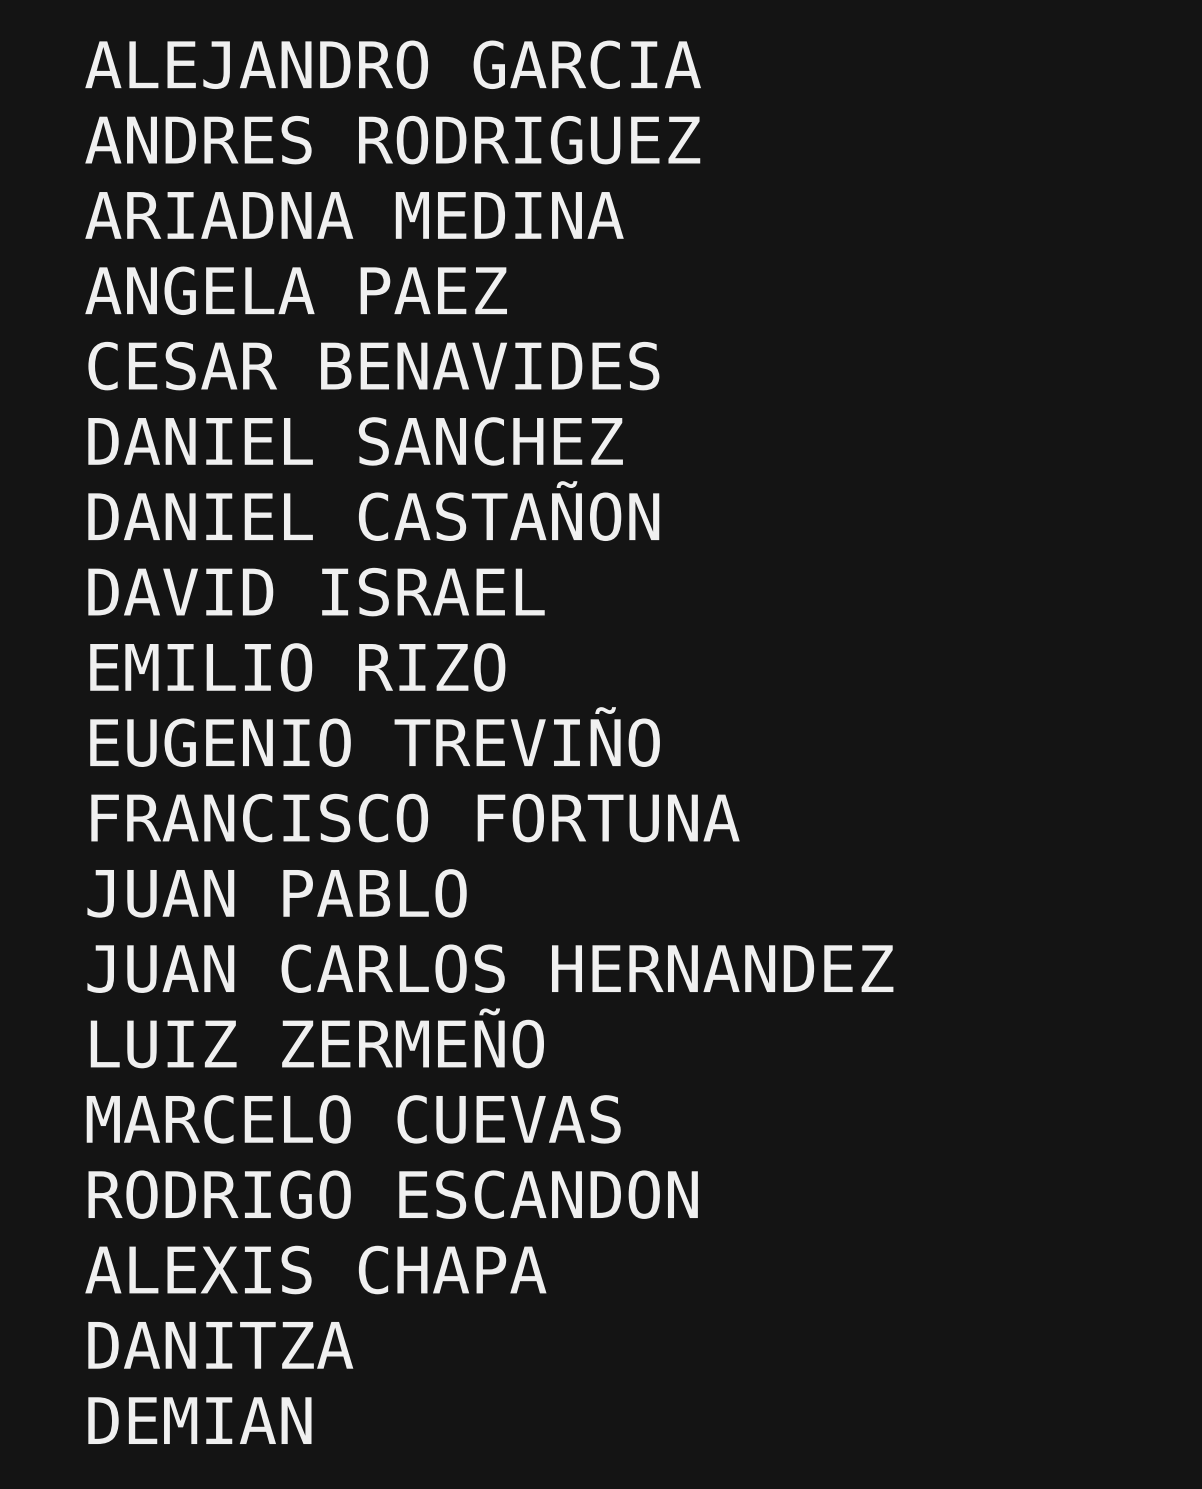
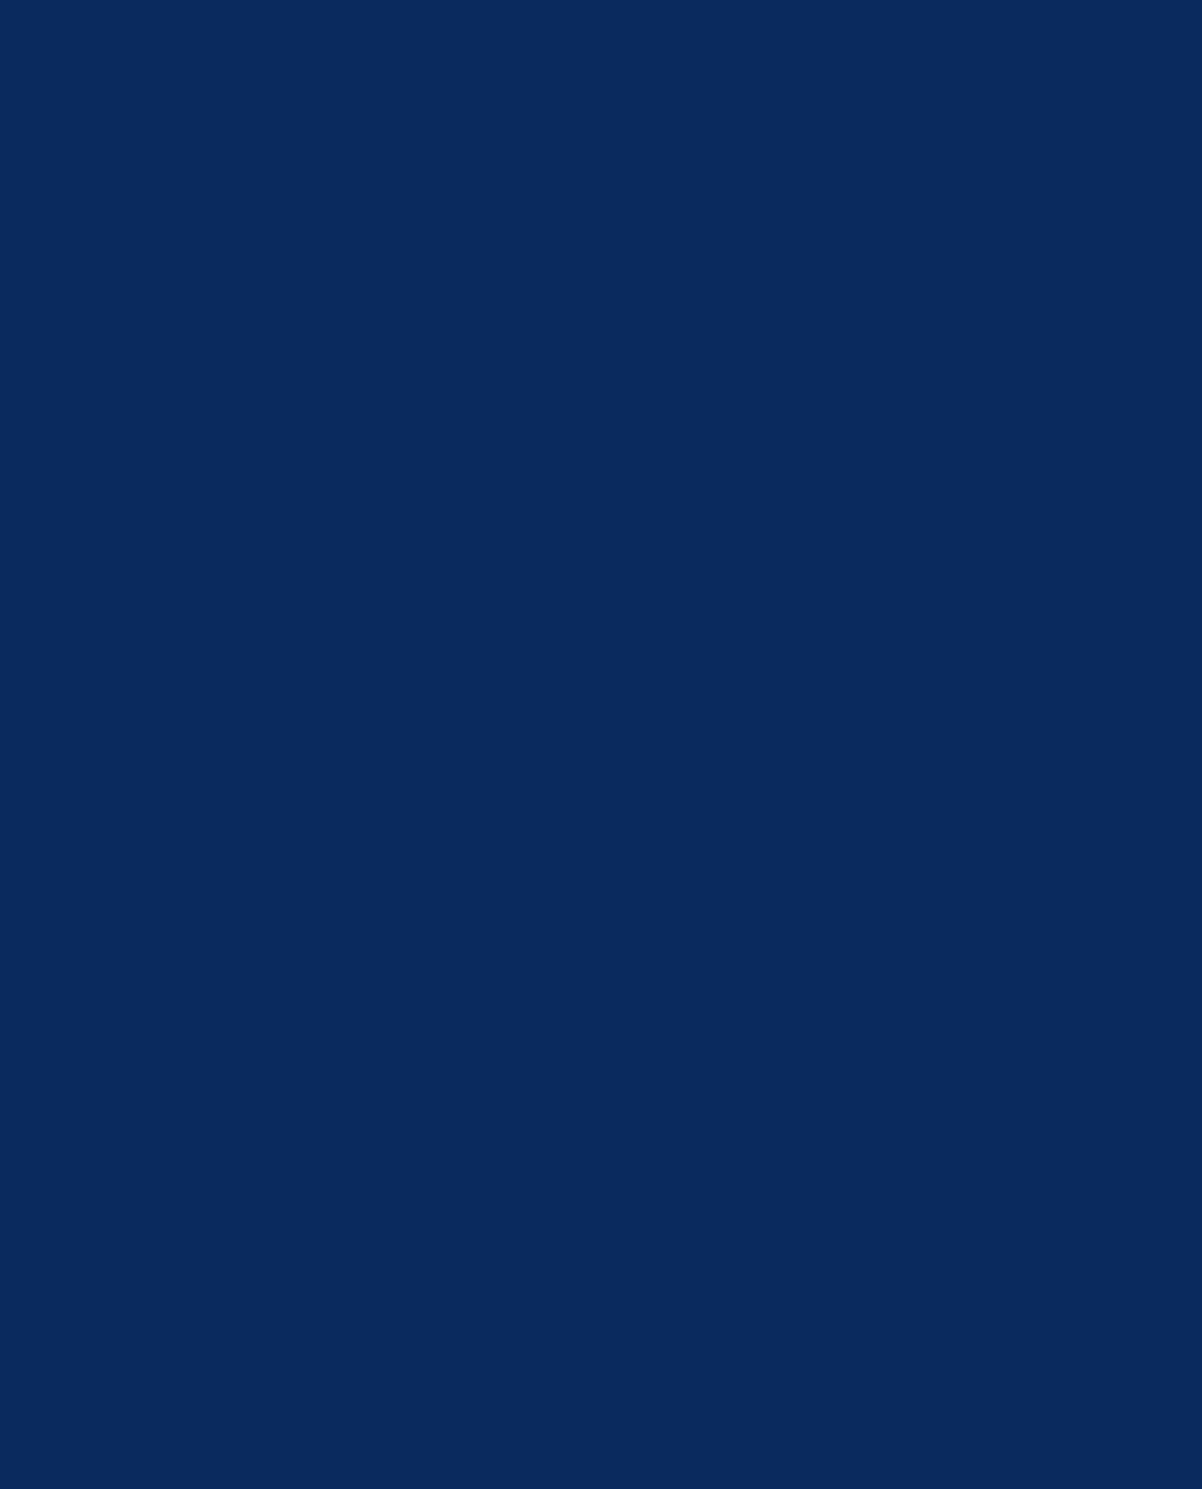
text: ALEJANDRO GARCIA (393, 64) -> none
text: ANDRES RODRIGUEZ (392, 140) -> none
text: ARIADNA MEDINA (354, 215) -> none
text: ANGELA PAEZ (296, 290) -> none
text: CESAR BENAVIDES (373, 366) -> none
text: DANIEL SANCHEZ (355, 441) -> none
text: DANIEL CASTAÑON (373, 511) -> none
text: DAVID ISRAEL (316, 592) -> none
text: EMILIO RIZO (297, 667) -> none
text: EUGENIO TREVIÑO (375, 737) -> none
text: FRANCISCO FORTUNA (415, 818) -> none
text: JUAN PABLO (277, 893) -> none
text: JUAN CARLOS HERNANDEZ (490, 968) -> none
text: LUIZ ZERMEÑO (317, 1038) -> none
text: MARCELO CUEVAS (353, 1119) -> none
text: RODRIGO ESCANDON (393, 1194) -> none
text: ALEXIS CHAPA (315, 1270) -> none
text: DANITZA (220, 1345) -> none
text: DEMIAN (199, 1420) -> none

